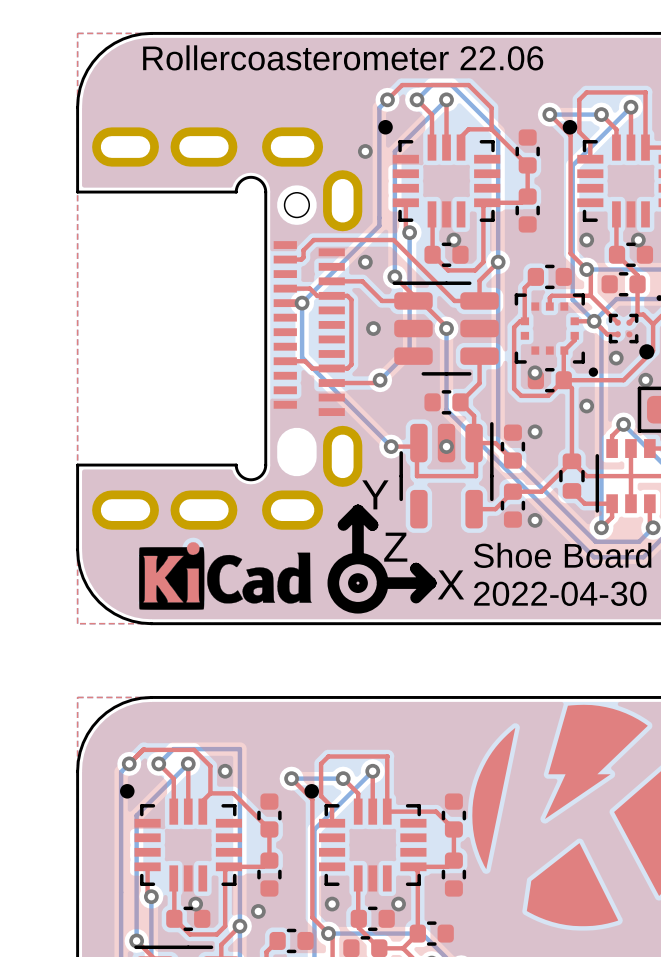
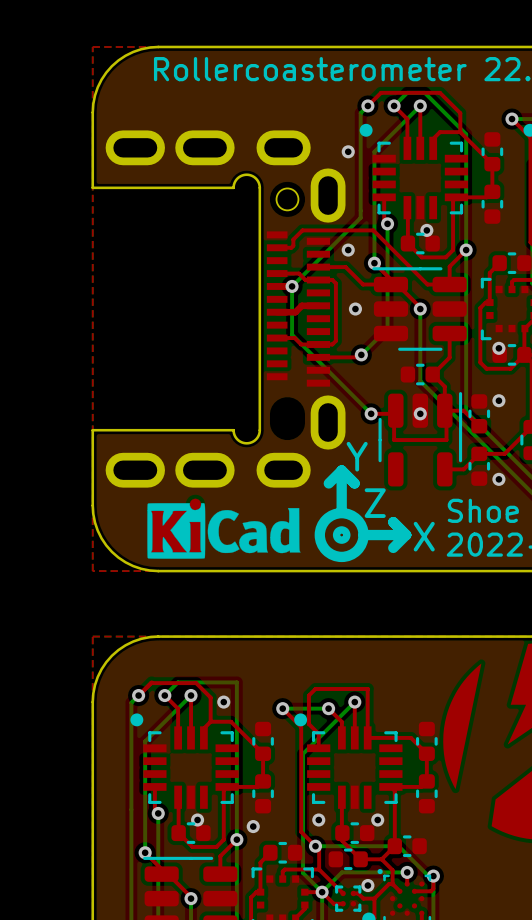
top track: none -> (318, 305) (301, 305) (295, 312) (277, 312)

